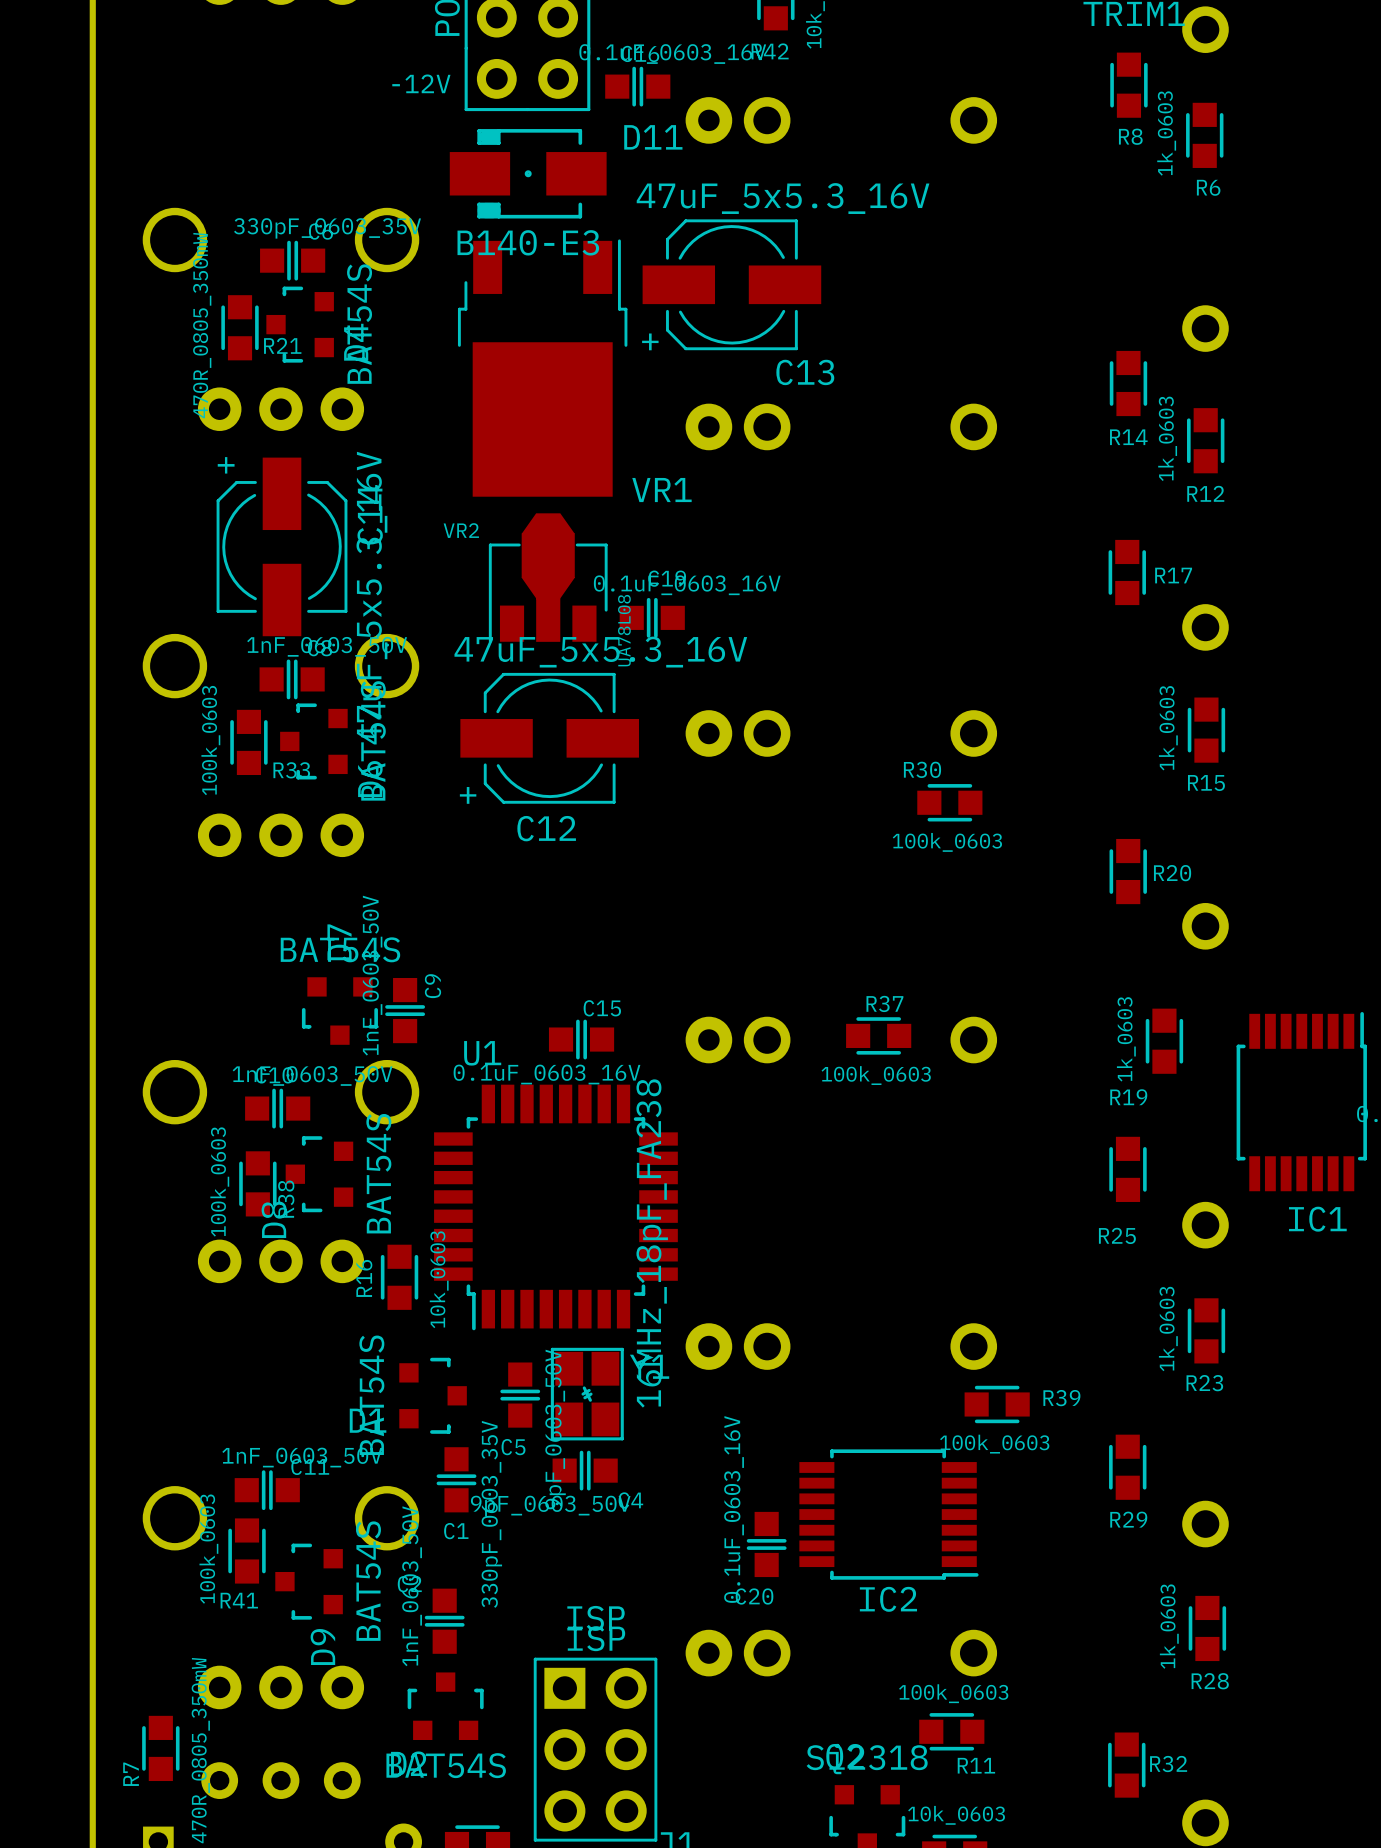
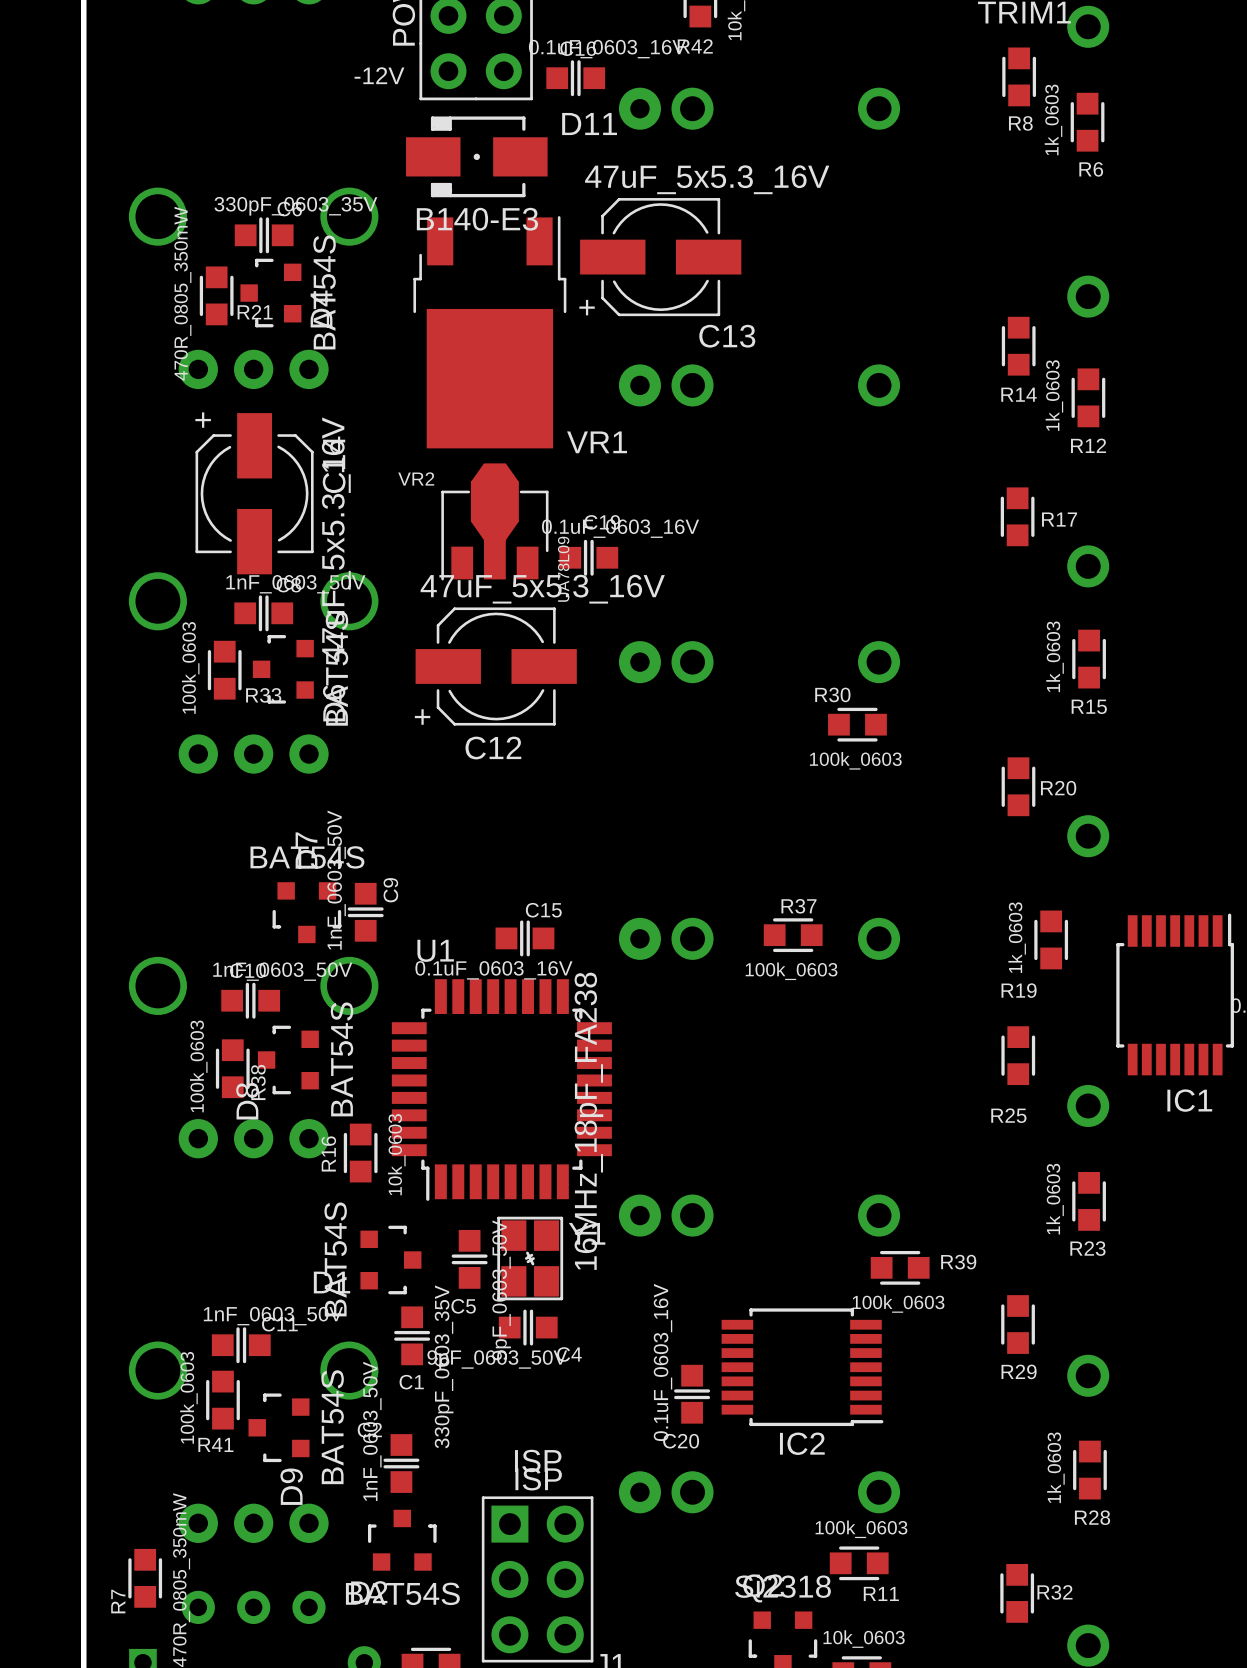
VR2 value: UA78L08 (624, 630) -> UA78L09 (563, 569)

